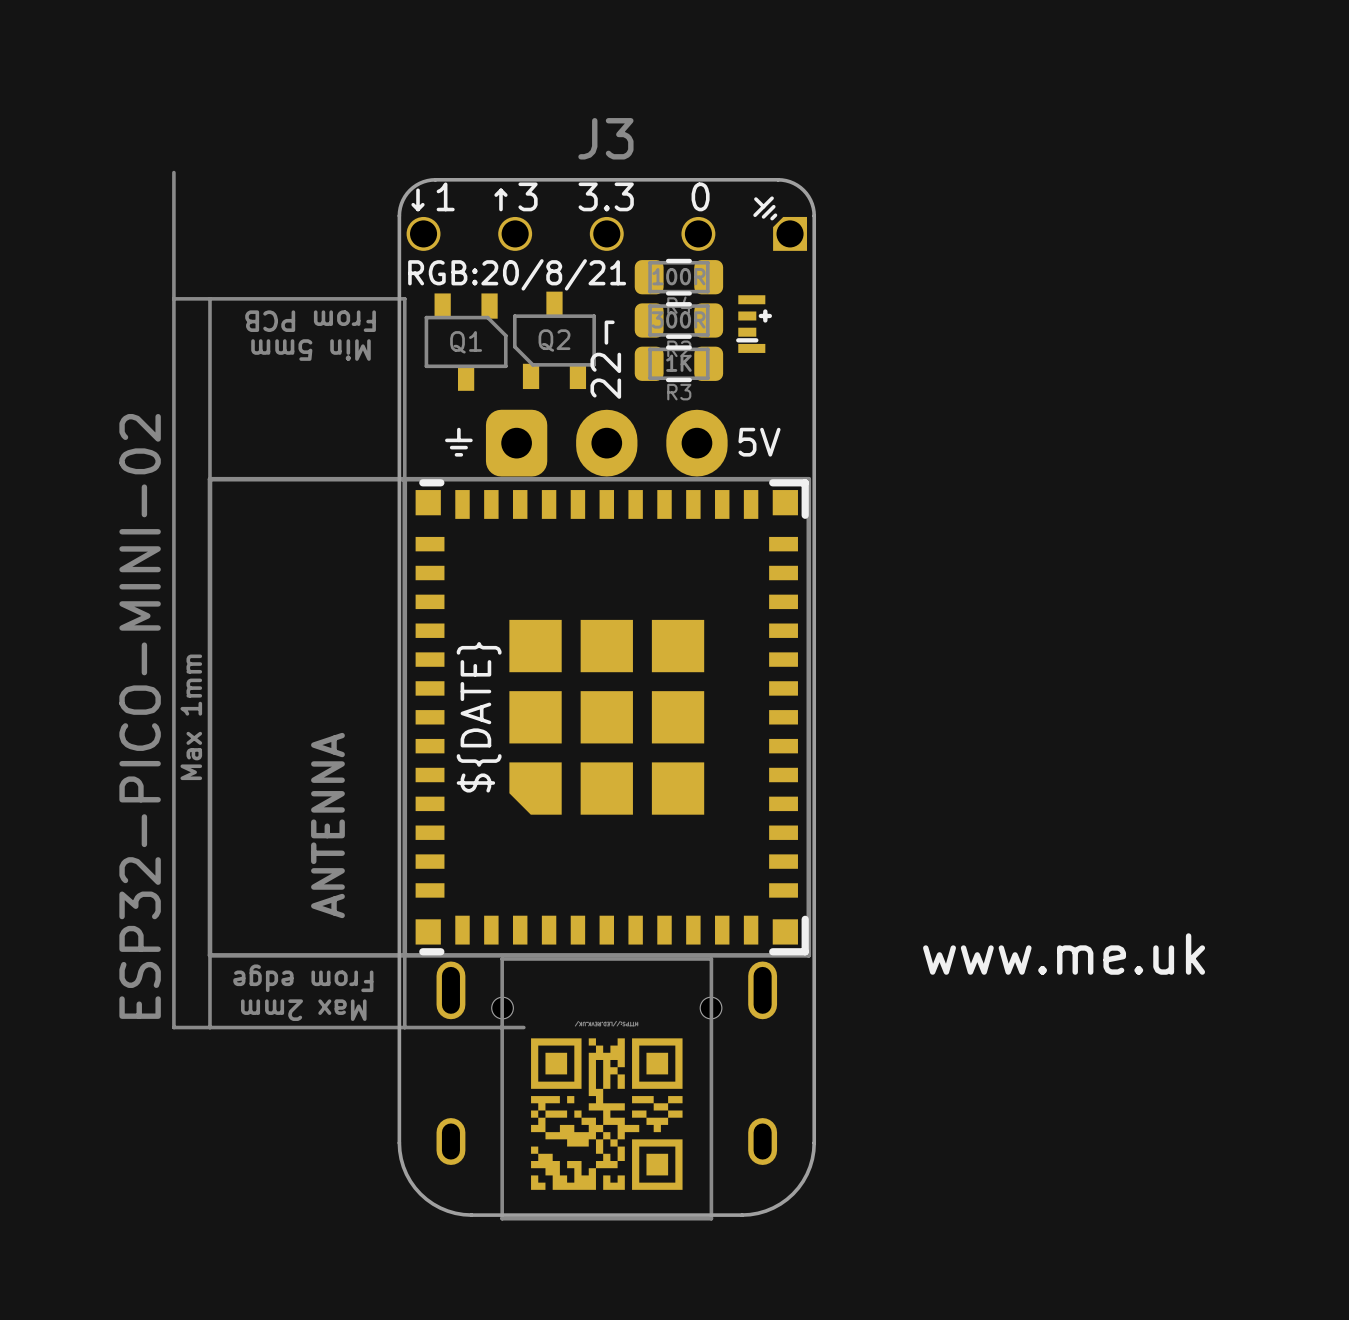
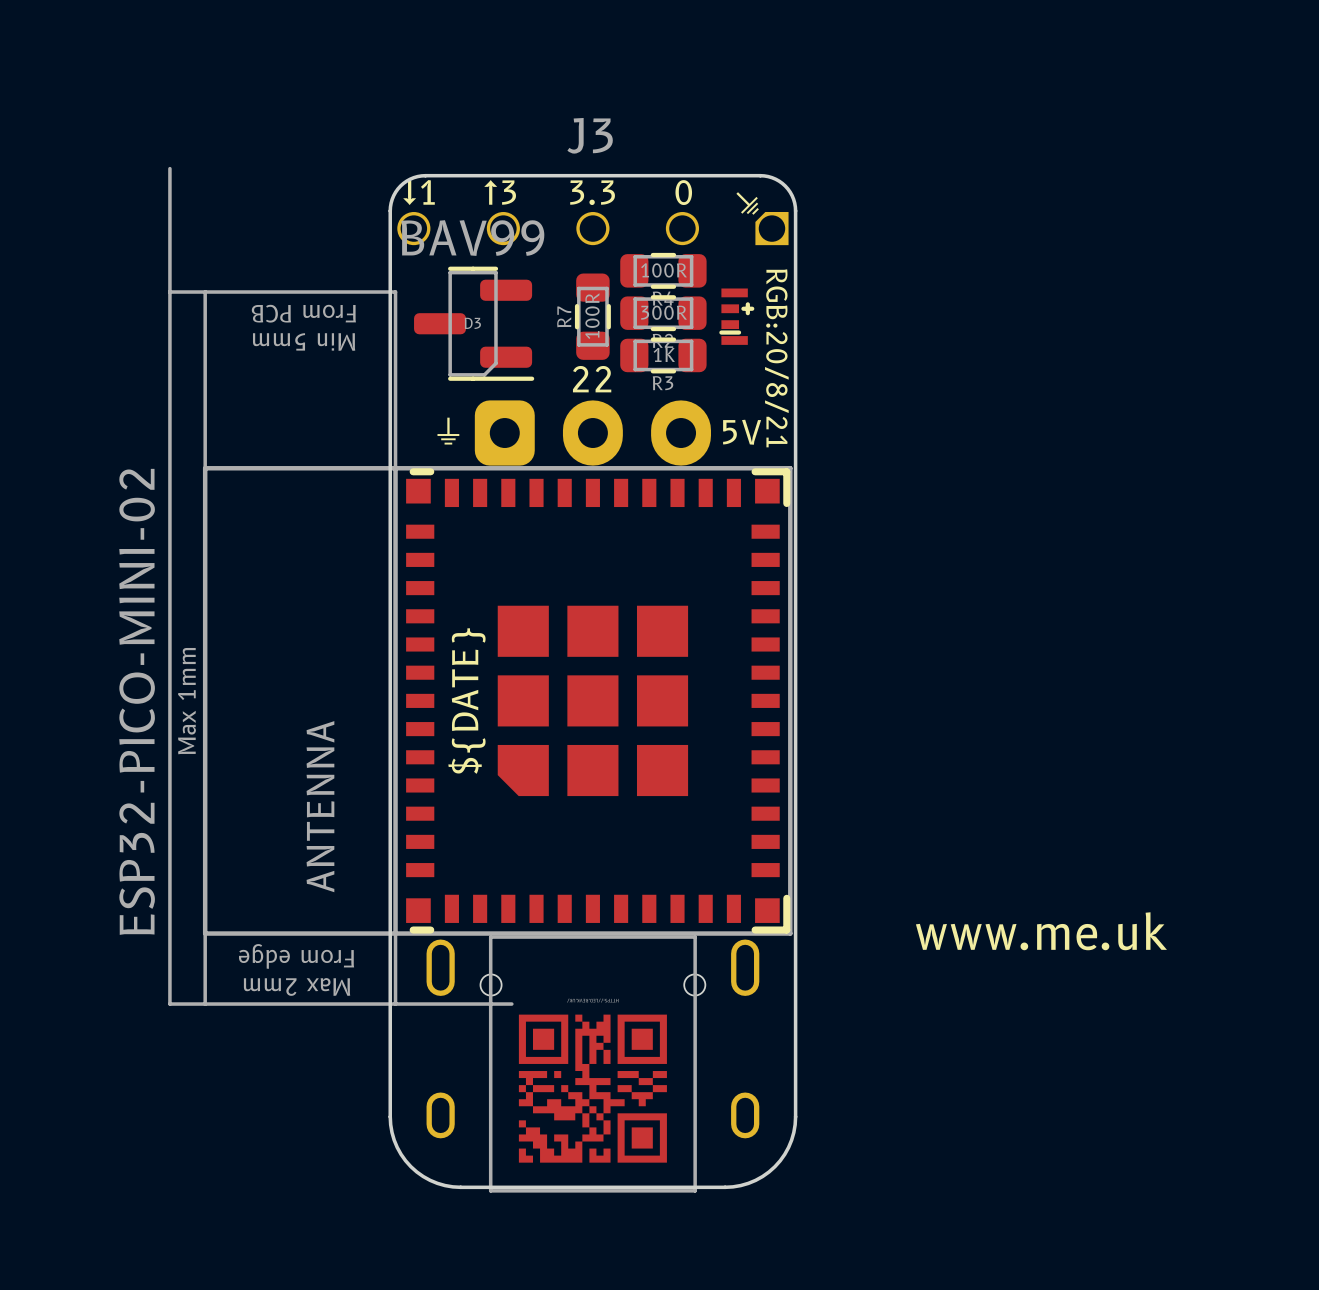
text rotation: 0° (517, 274) -> 90° clockwise (776, 358)
text position: RGB:20/8/21 (517, 274) -> RGB:20/8/21 (776, 358)
R7: none -> 100R (592, 316)
D3: none -> BAV99 (474, 323)
Q2: (554, 340) -> none
Q1: (466, 342) -> none
text: 22¬ (605, 359) -> 22 (592, 379)

